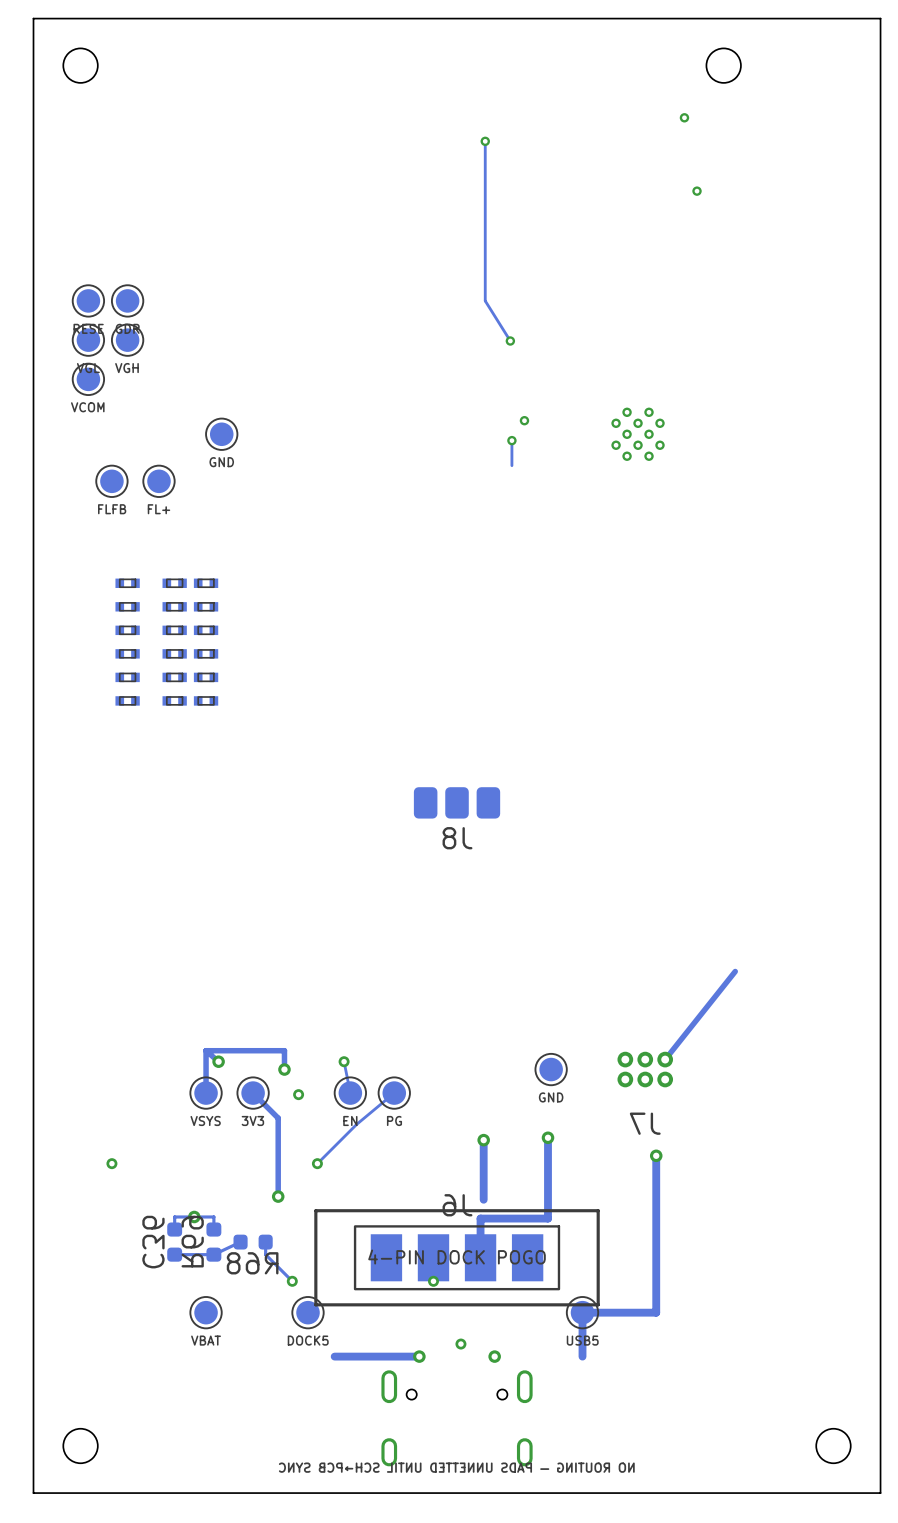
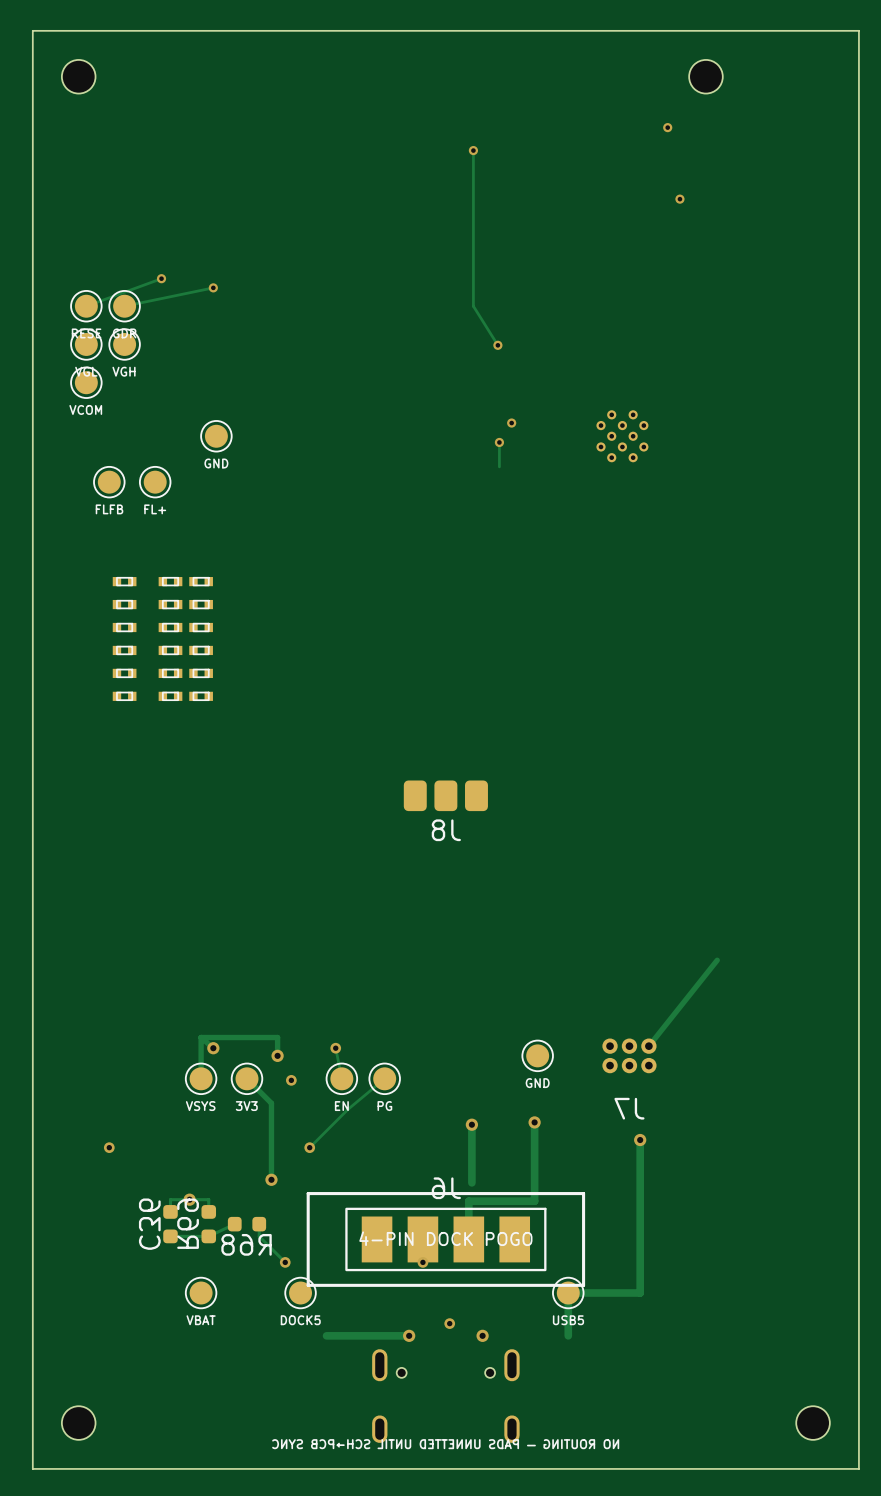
track: none -> (161, 278) (86, 306)
via: none -> (161, 278)
track: none -> (213, 287) (124, 306)
via: none -> (213, 287)

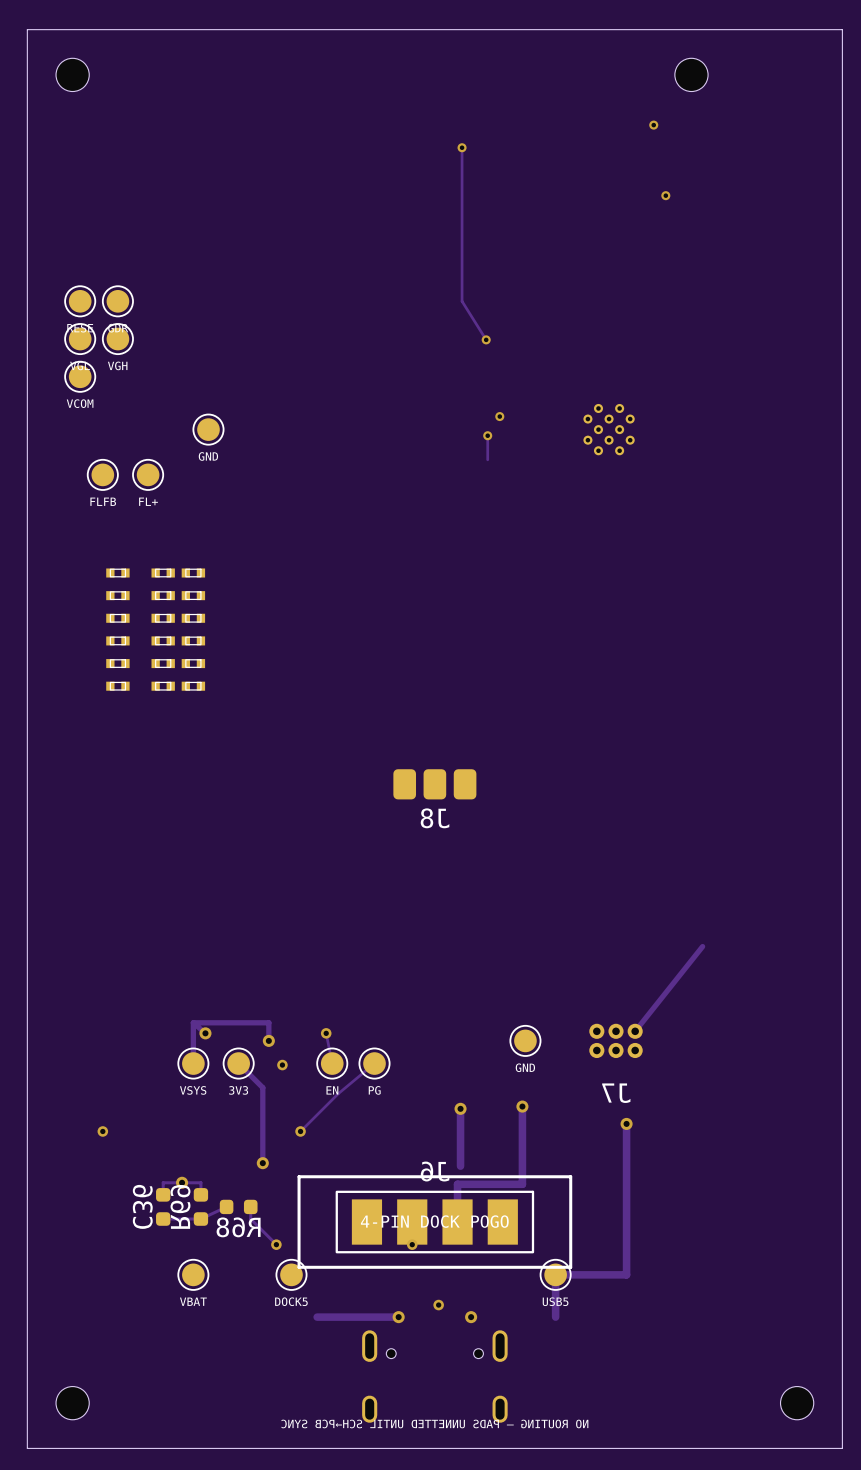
track: (161, 278) (86, 306) -> none
via: (161, 278) -> none
track: (213, 287) (124, 306) -> none
via: (213, 287) -> none

